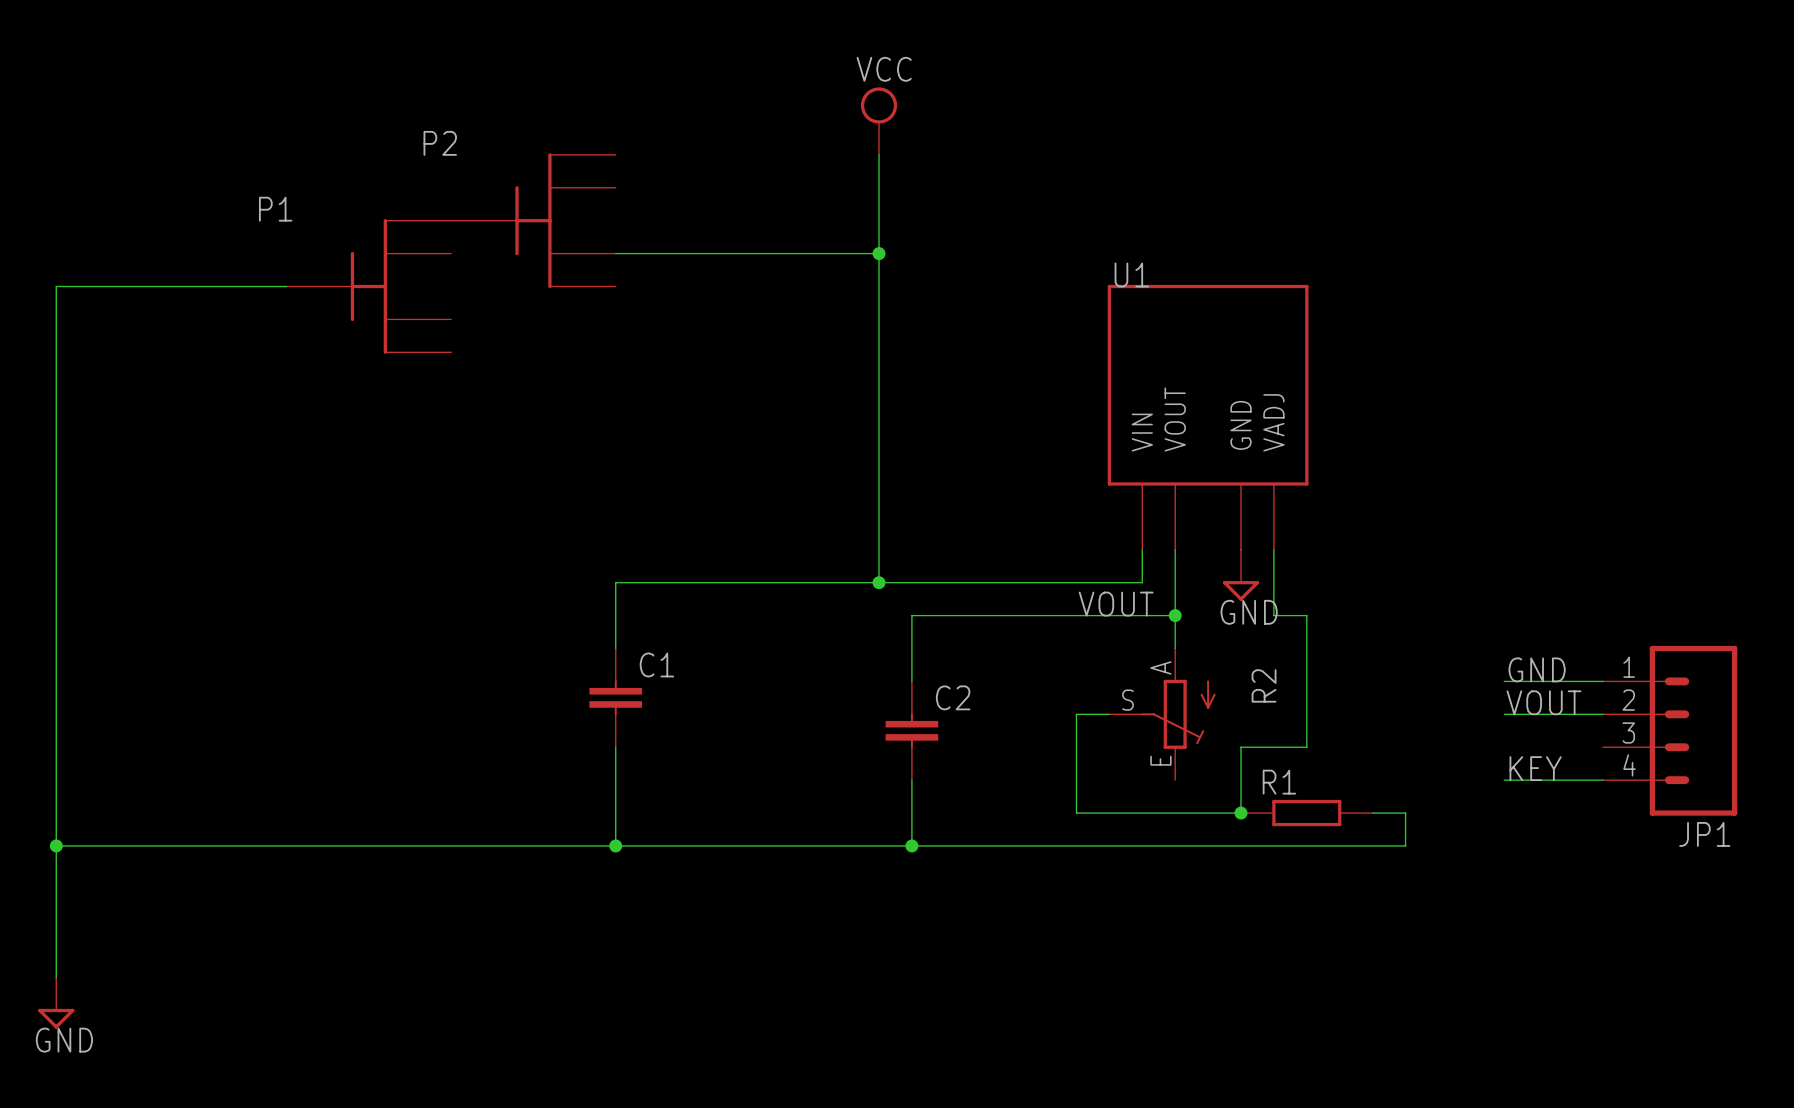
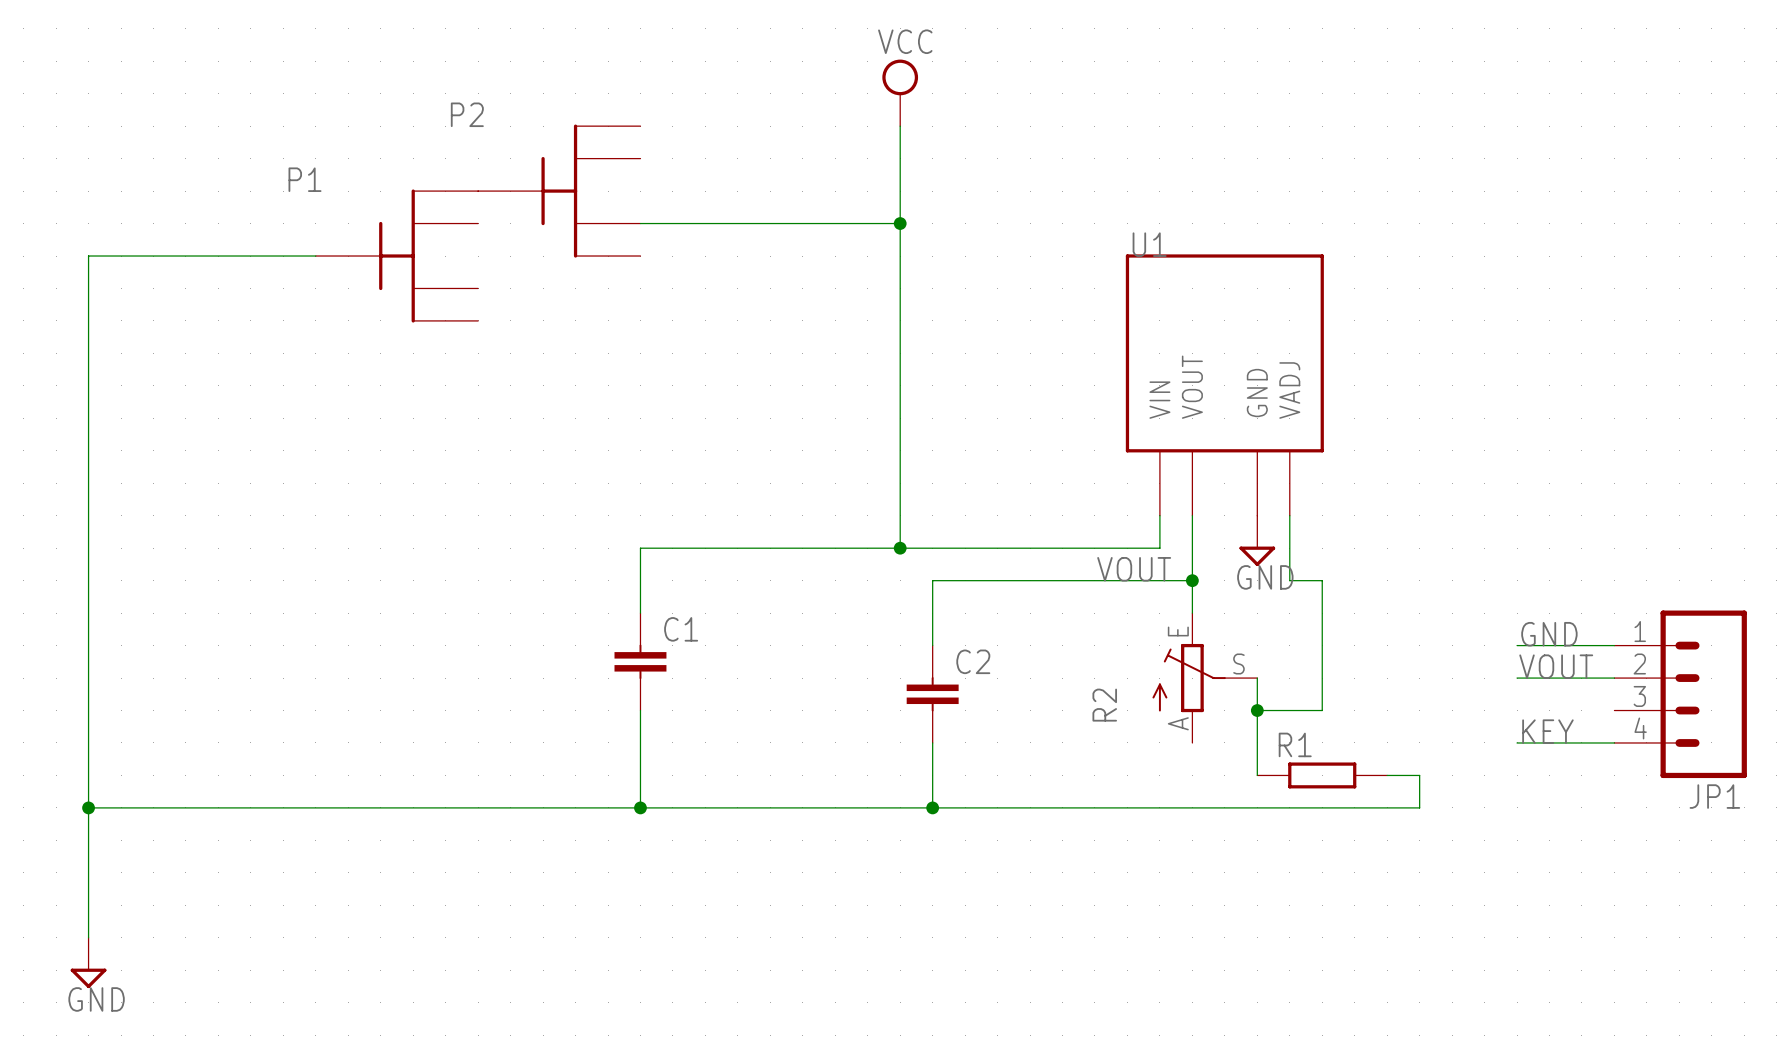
wire: (1109, 714) (1076, 714) (1076, 813) (1241, 813) -> none
R2 rotation: 0° (1178, 714) -> 180° (1189, 678)
wire: none -> (1257, 678) (1257, 710)
junction position: (1241, 813) -> (1257, 710)

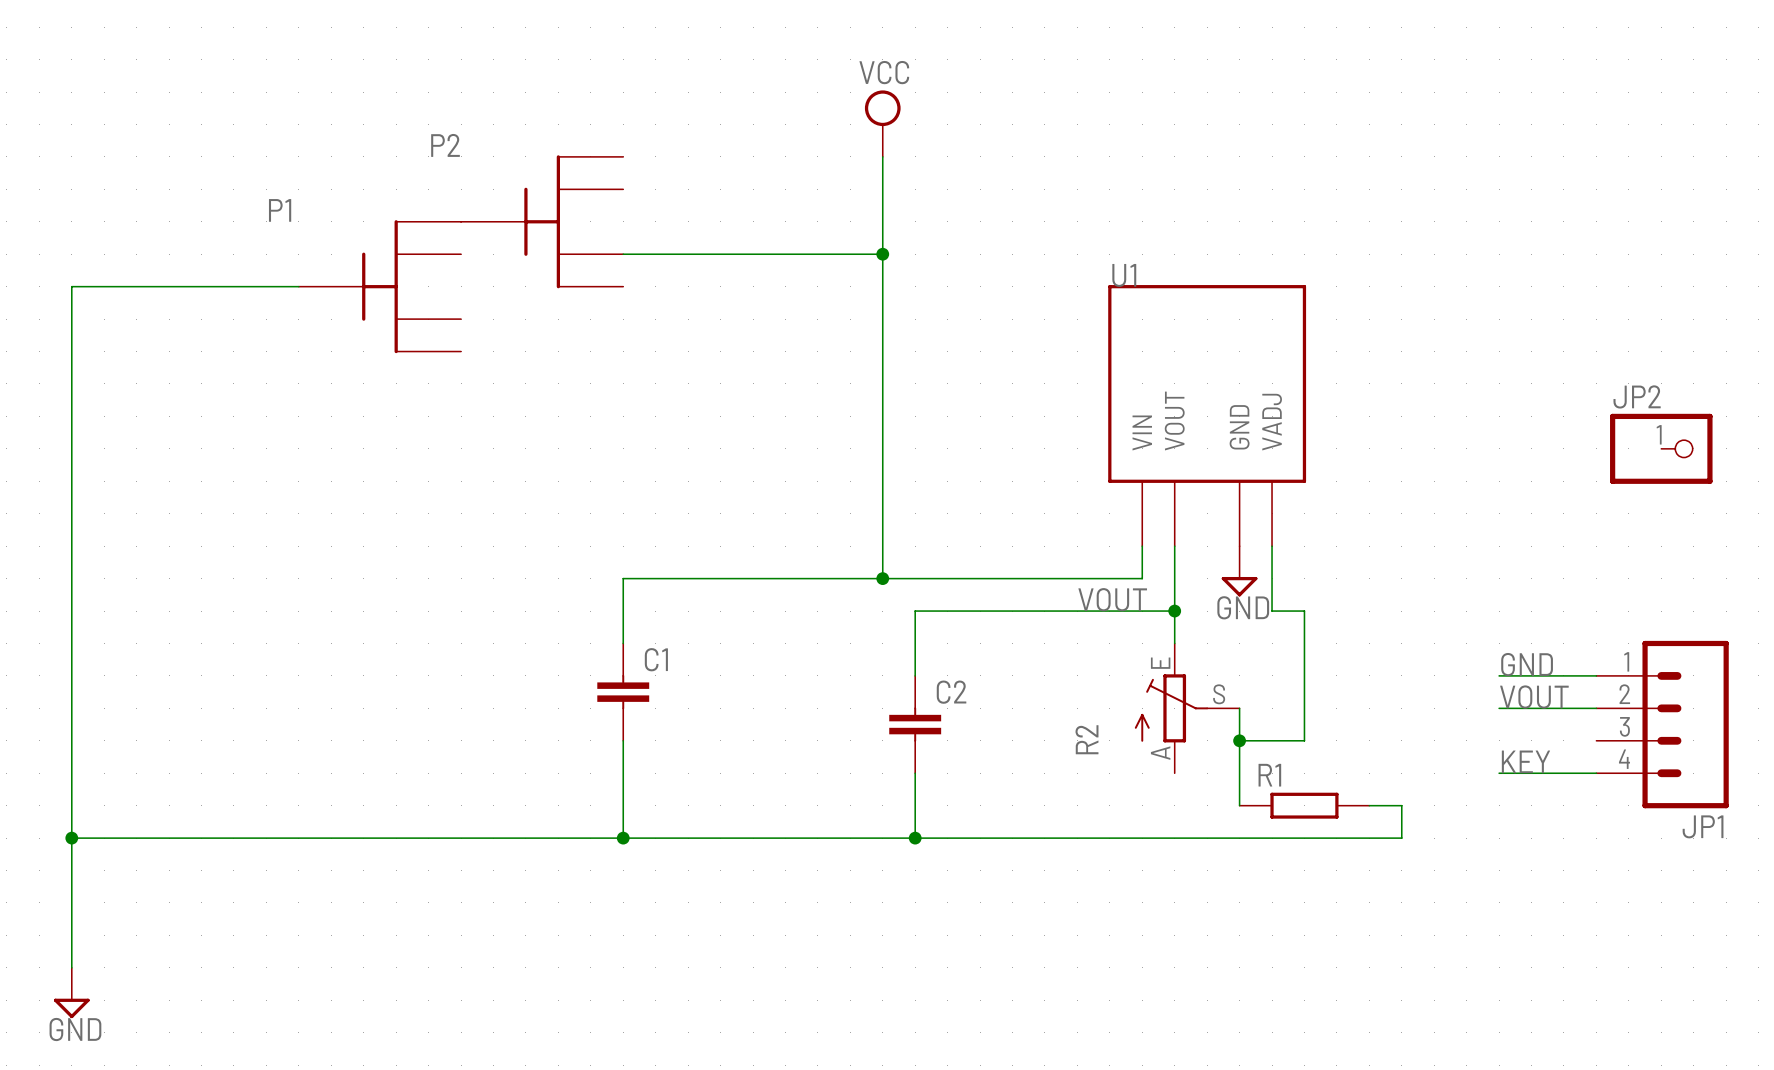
JP2: none -> (1661, 448)

